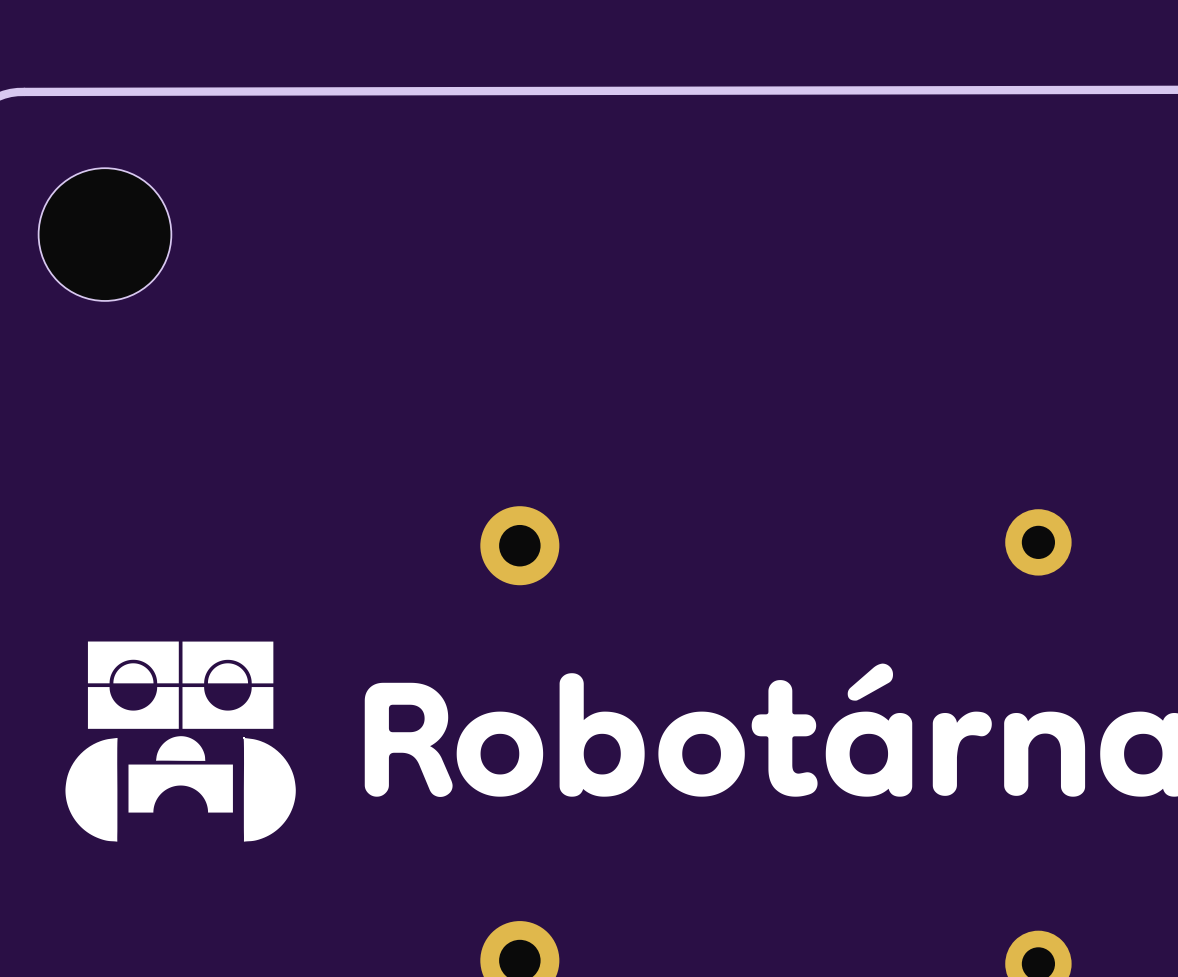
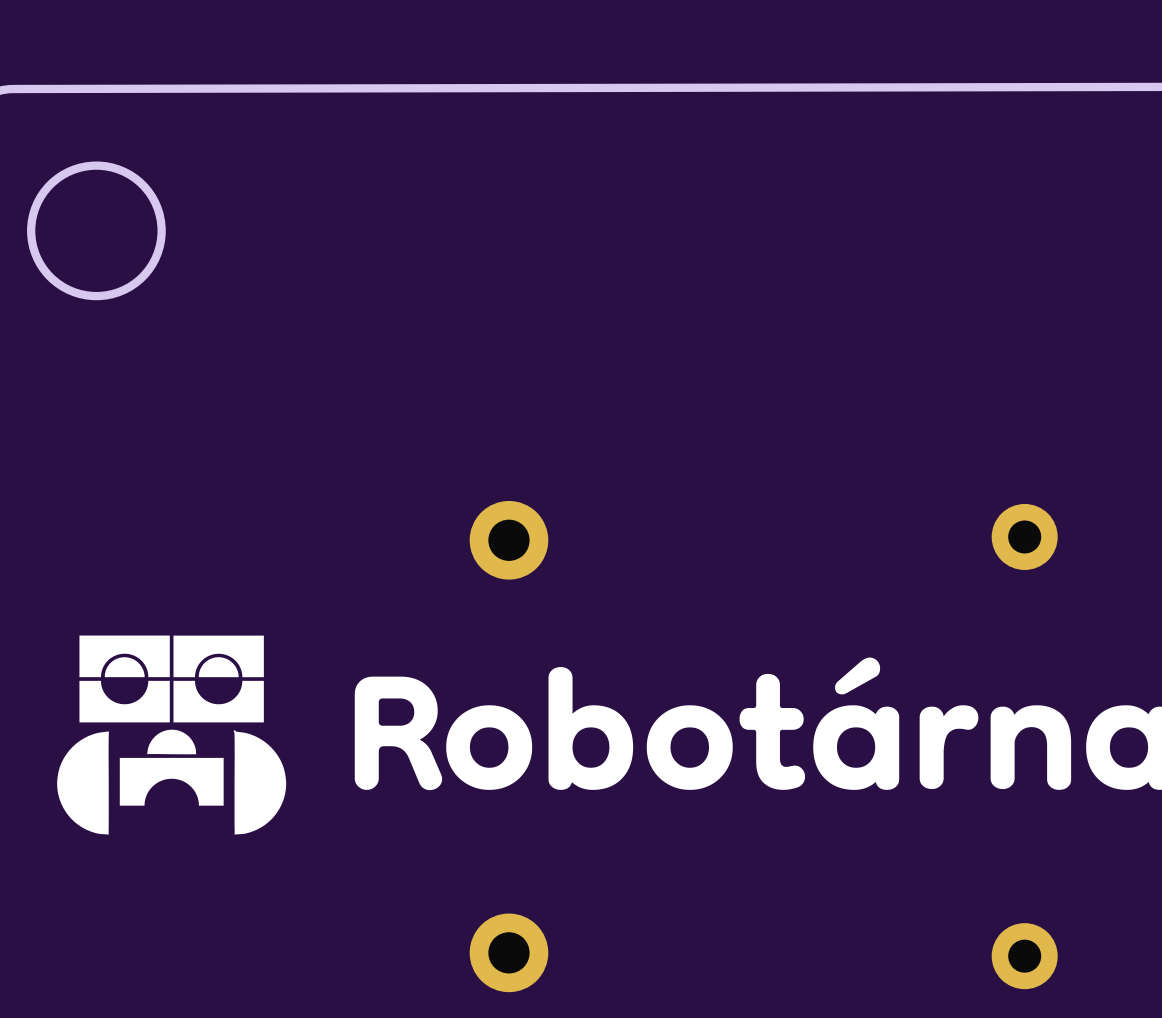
round board edge: none -> [27, 161, 166, 301]
part: (104, 234) -> none

